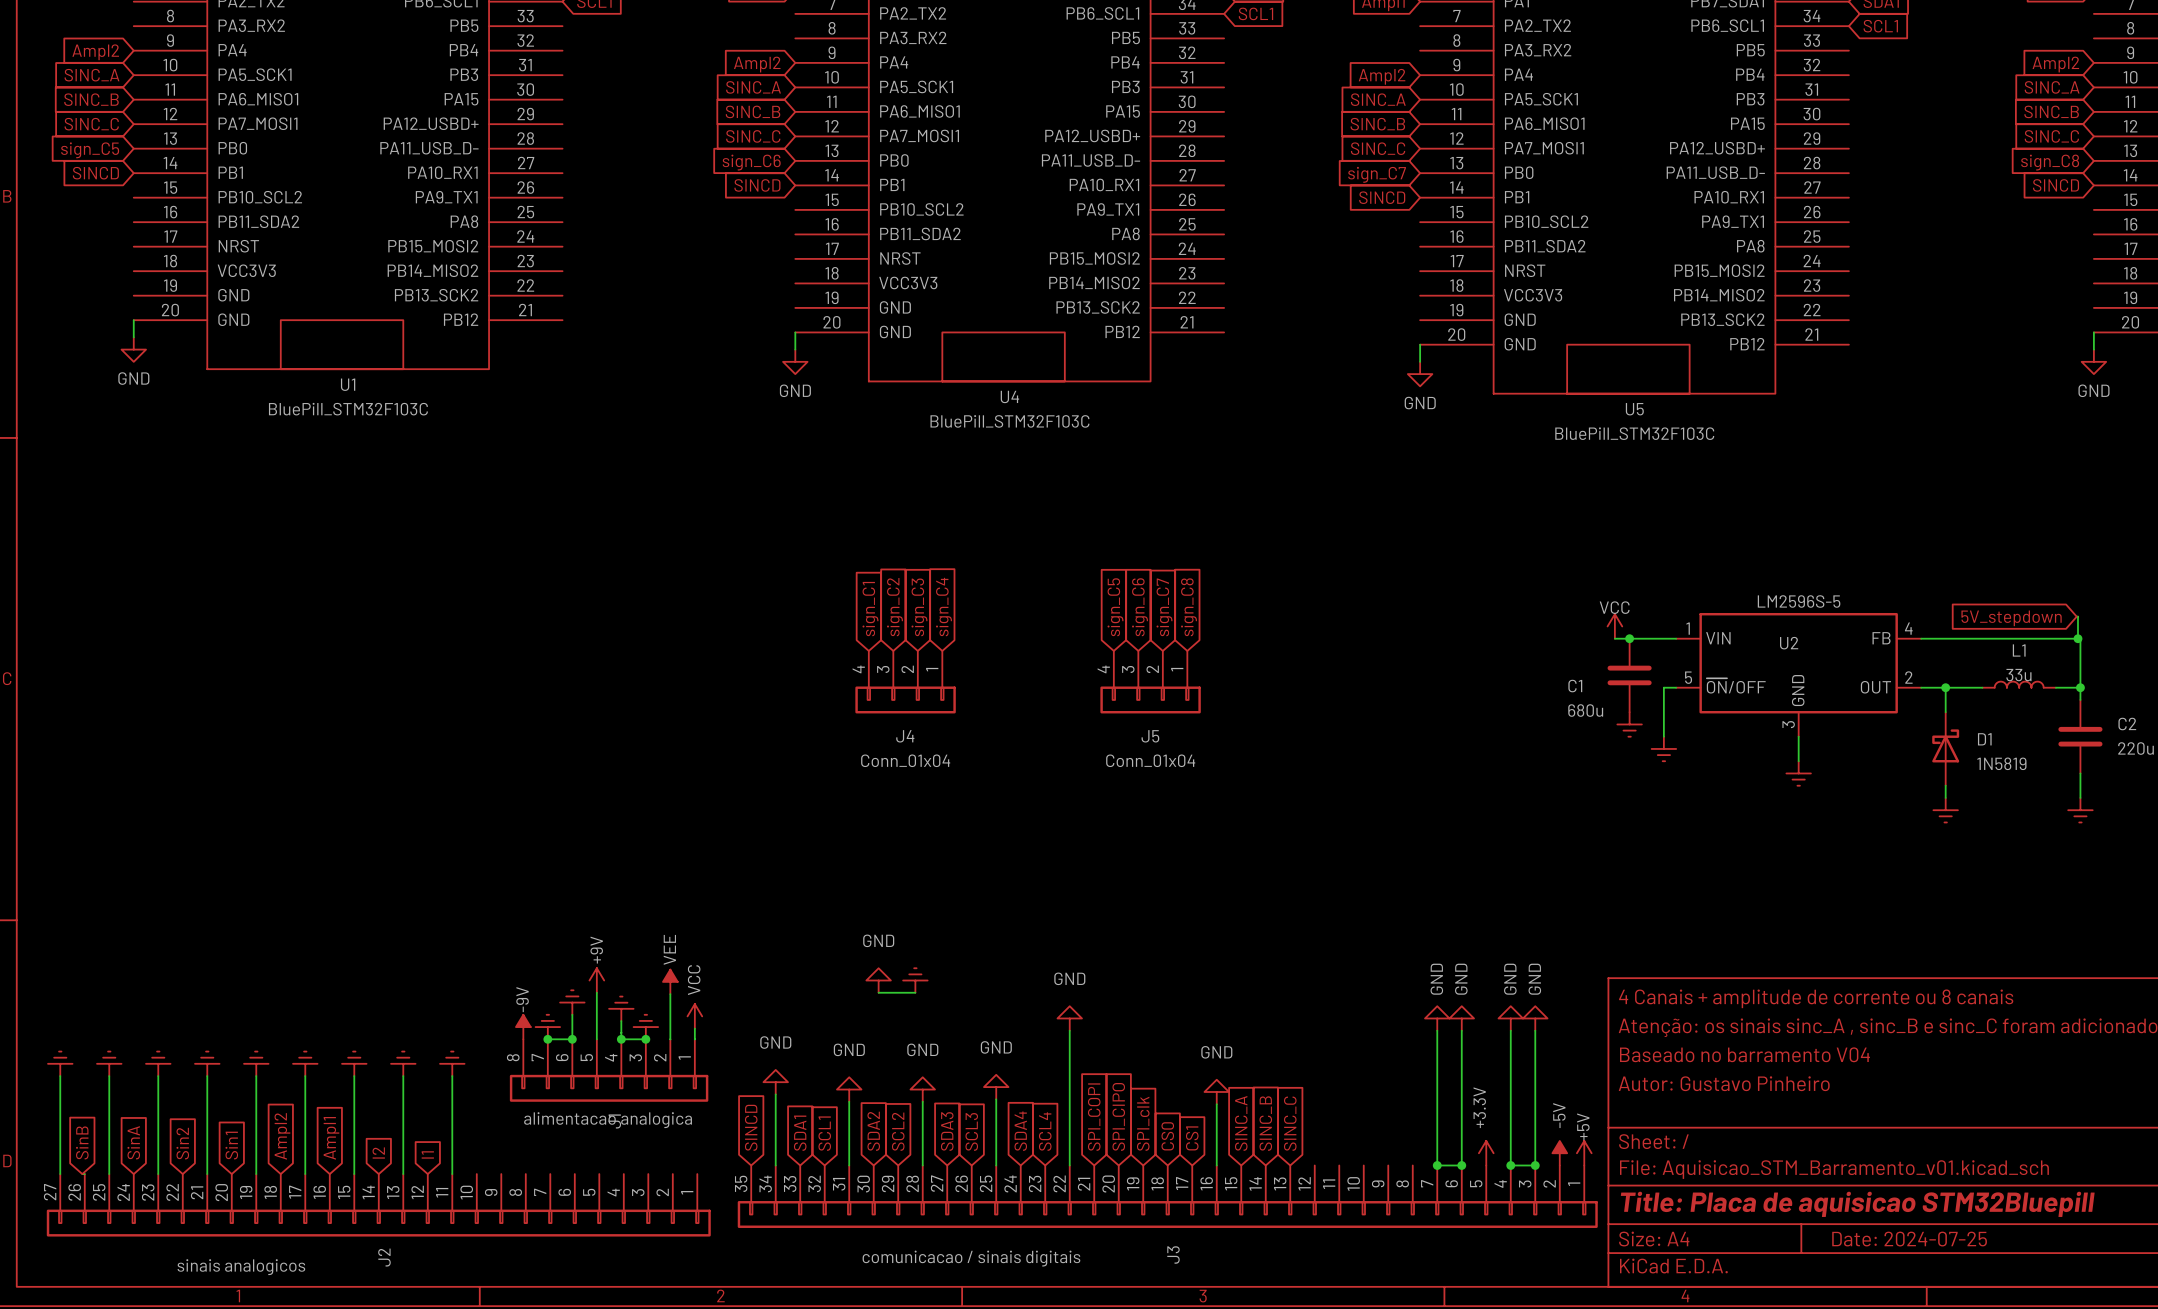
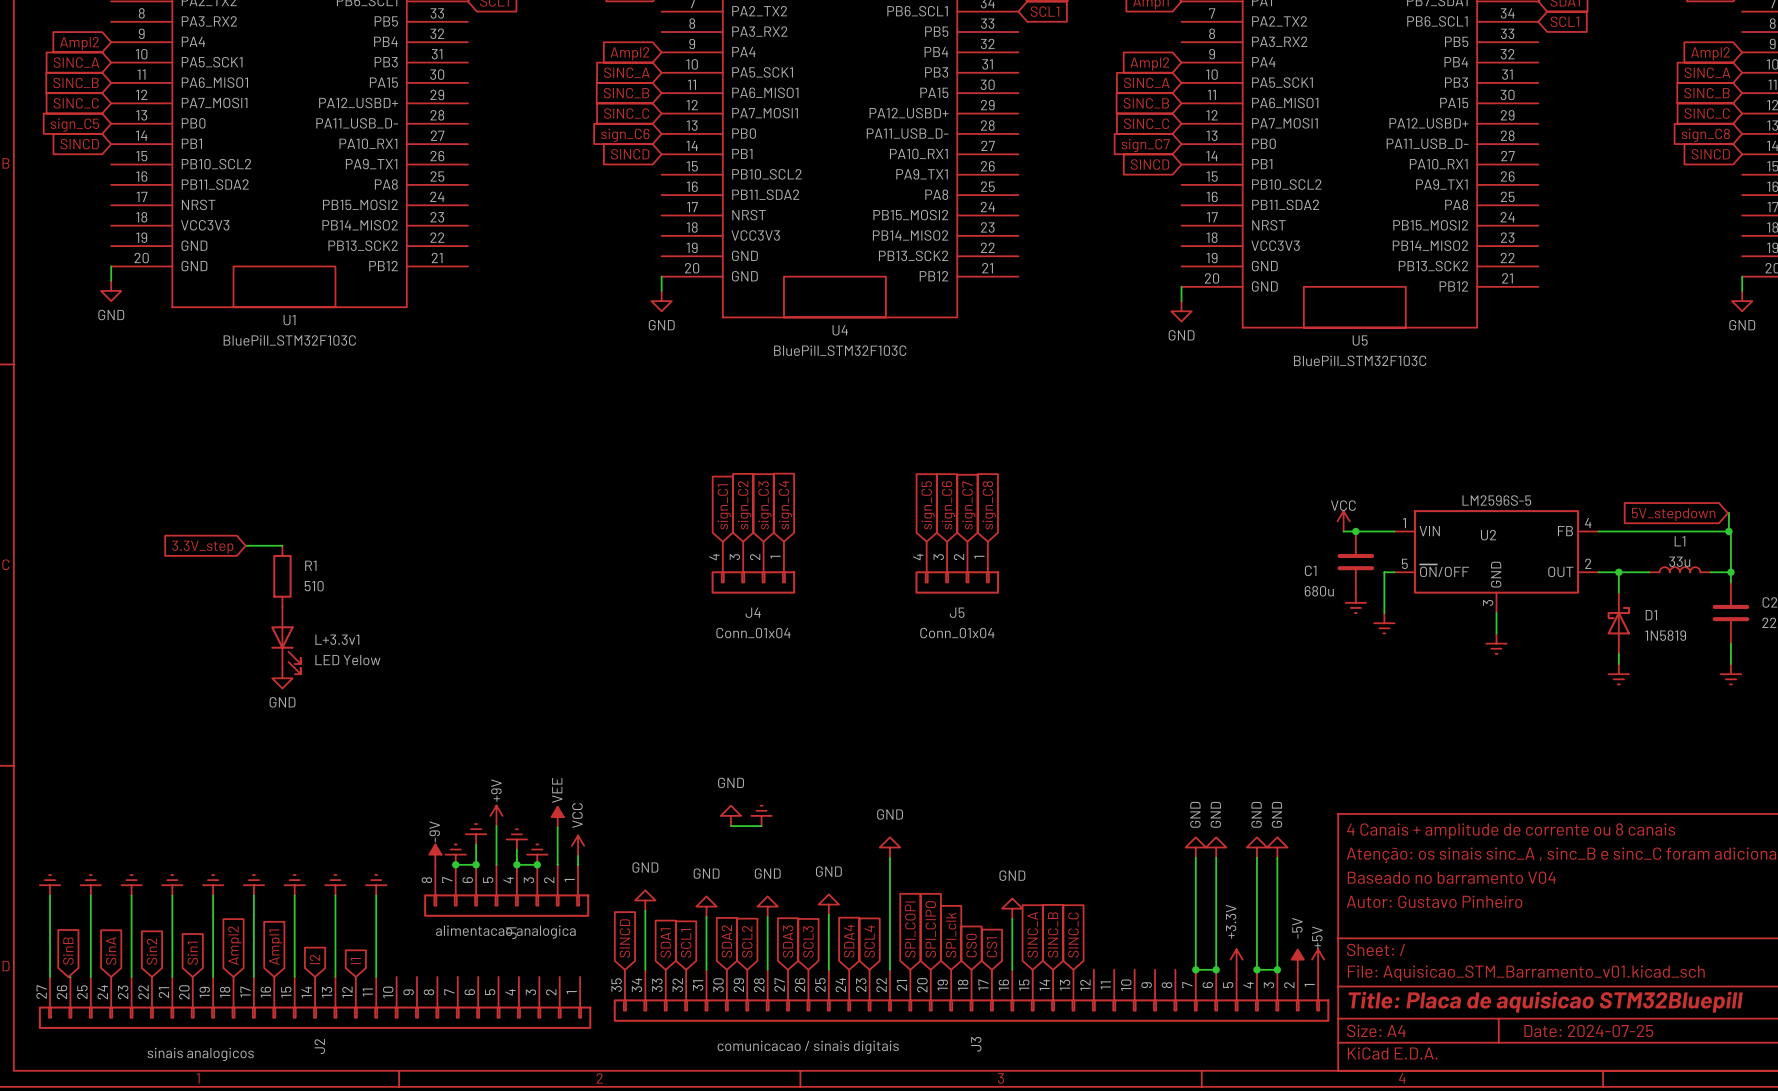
wire: none -> (245, 545) (282, 545)
global label: none -> 3.3V_step (202, 547)
R1: none -> 510 (282, 576)
L+3.3v1: none -> LED Yelow (286, 640)
power symbol: none -> GND (282, 678)

